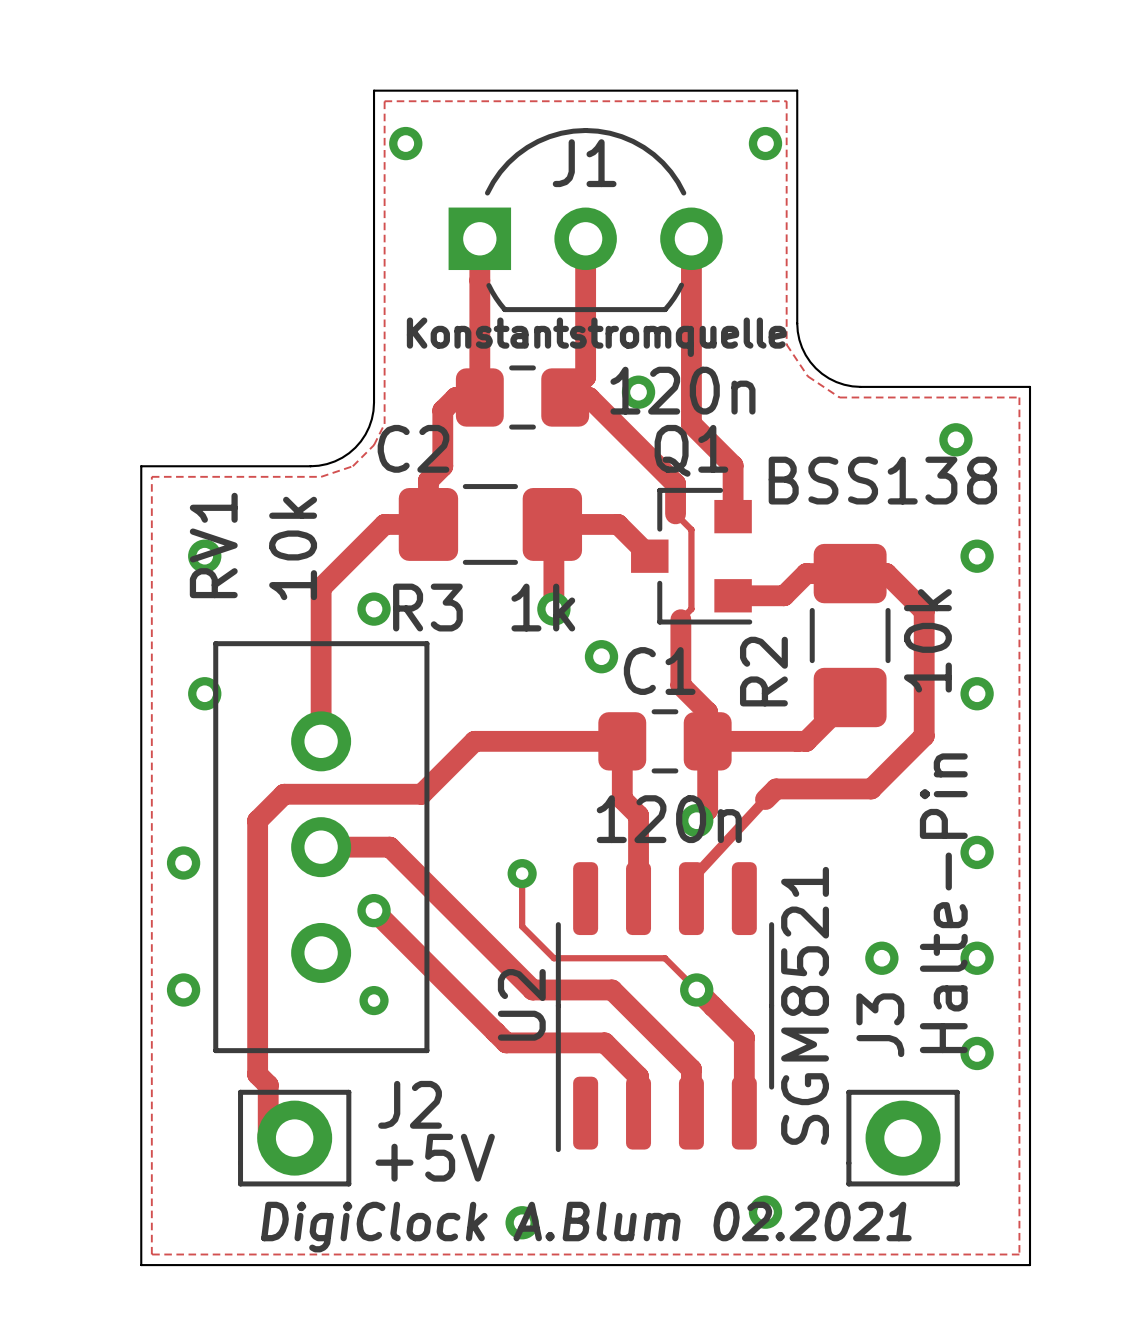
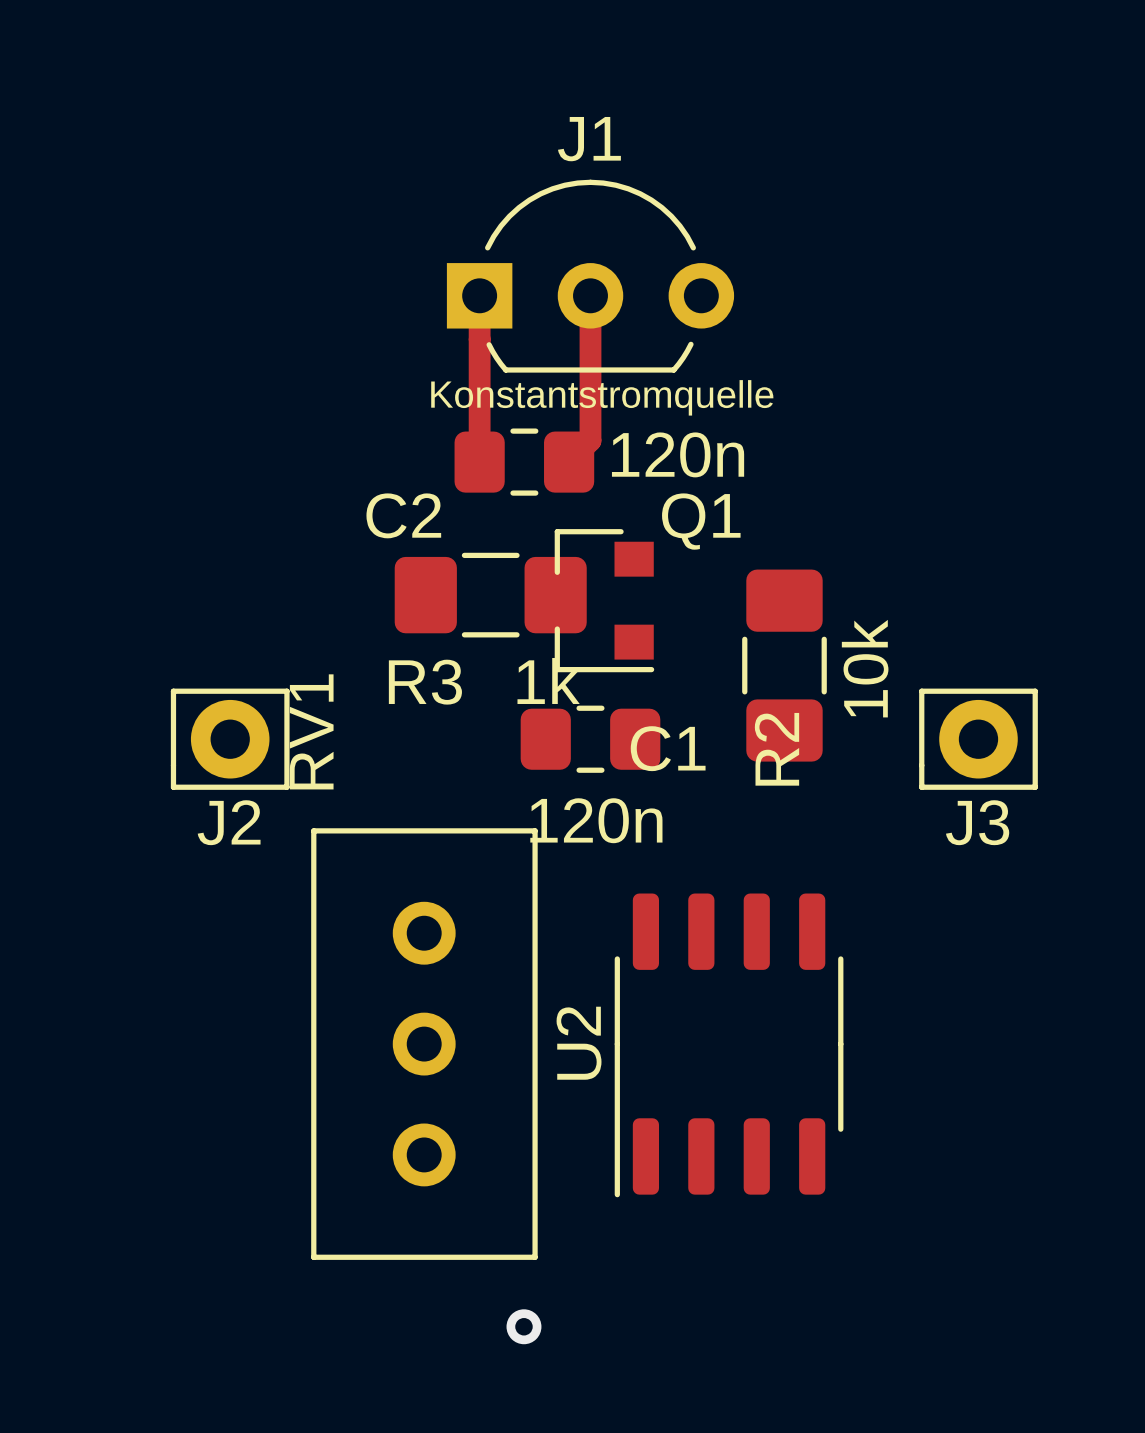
board edge: (374, 90) (374, 402) (371, 419) (365, 434) (355, 447) (342, 457) (318, 465) (141, 466) (141, 1265) (1030, 1265) (1030, 386) (852, 386) (828, 378) (810, 362) (802, 347) (797, 323) (797, 90) (374, 90) -> none
zone outline: (384, 101) (384, 423) (374, 445) (352, 466) (321, 476) (151, 476) (151, 1254) (1019, 1254) (1019, 397) (839, 397) (807, 376) (786, 344) (786, 101) (384, 101) -> none
via: (405, 143) -> none
via: (765, 143) -> none
J1 name position: J1 (584, 163) -> J1 (589, 139)
track: (691, 238) (691, 423) (733, 465) (733, 516) -> none
via: (638, 392) -> none
track: (479, 397) (455, 397) (442, 410) (442, 466) (428, 480) (428, 524) (384, 524) (321, 587) (321, 741) -> none
track: (565, 397) (589, 397) (675, 483) (675, 513) (691, 529) (691, 609) (680, 619) (680, 685) (707, 712) (707, 809) (696, 820) -> none
via: (955, 439) -> none
Q1 value: BSS138 (882, 480) -> none
RV1 value: 10k (293, 548) -> none
via: (204, 556) -> none
track: (649, 556) (618, 524) (552, 524) (553, 609) -> none
Q1 position: (691, 556) -> (590, 600)
via: (977, 556) -> none
track: (733, 595) (784, 595) (806, 573) (886, 573) (924, 611) (924, 736) (871, 788) (776, 788) (691, 879) (691, 898) -> none
via: (374, 609) -> none
via: (553, 609) -> none
R2 position: (850, 635) -> (784, 665)
via: (601, 656) -> none
via: (204, 693) -> none
via: (977, 693) -> none
track: (850, 697) (806, 741) (707, 741) -> none
track: (622, 741) (474, 741) (421, 794) (284, 794) (257, 820) (257, 1074) (268, 1085) (268, 1138) -> none
track: (622, 741) (622, 799) (638, 815) (638, 898) -> none
C1 position: (664, 741) -> (590, 739)
via: (696, 820) -> none
track: (321, 847) (389, 847) (532, 989) (612, 989) (691, 1069) (691, 1113) -> none
RV1 position: (321, 847) -> (424, 1044)
via: (977, 852) -> none
via: (183, 863) -> none
track: (522, 873) (522, 926) (553, 958) (664, 958) (744, 1037) (744, 1113) -> none
via: (522, 873) -> none
J3 value: Halte-Pin (943, 903) -> none
track: (374, 910) (506, 1042) (604, 1042) (638, 1076) (638, 1113) -> none
via: (374, 910) -> none
via: (881, 958) -> none
via: (977, 958) -> none
via: (183, 989) -> none
via: (696, 989) -> none
via: (374, 1000) -> none
U2 value: SGM8521 (805, 1005) -> none
U2 position: (664, 1007) -> (729, 1045)
J3 name rotation: 0° (880, 1025) -> 90° clockwise (977, 822)
J3 name position: J3 (880, 1025) -> J3 (977, 822)
via: (977, 1053) -> none
J2 name position: J2 (410, 1104) -> J2 (229, 822)
J2 position: (294, 1138) -> (230, 739)
J3 position: (903, 1138) -> (978, 739)
J2 value: +5V (435, 1157) -> none
via: (765, 1212) -> none
text: DigiClock A.Blum 02.2021 (586, 1227) -> none

